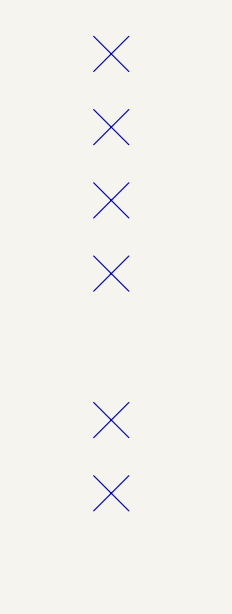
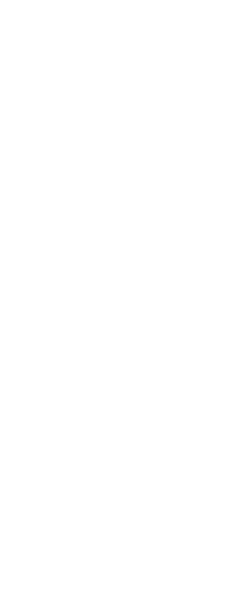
no-connect mark: (111, 53) -> none
no-connect mark: (111, 127) -> none
no-connect mark: (111, 200) -> none
no-connect mark: (111, 273) -> none
no-connect mark: (111, 420) -> none
no-connect mark: (111, 493) -> none

